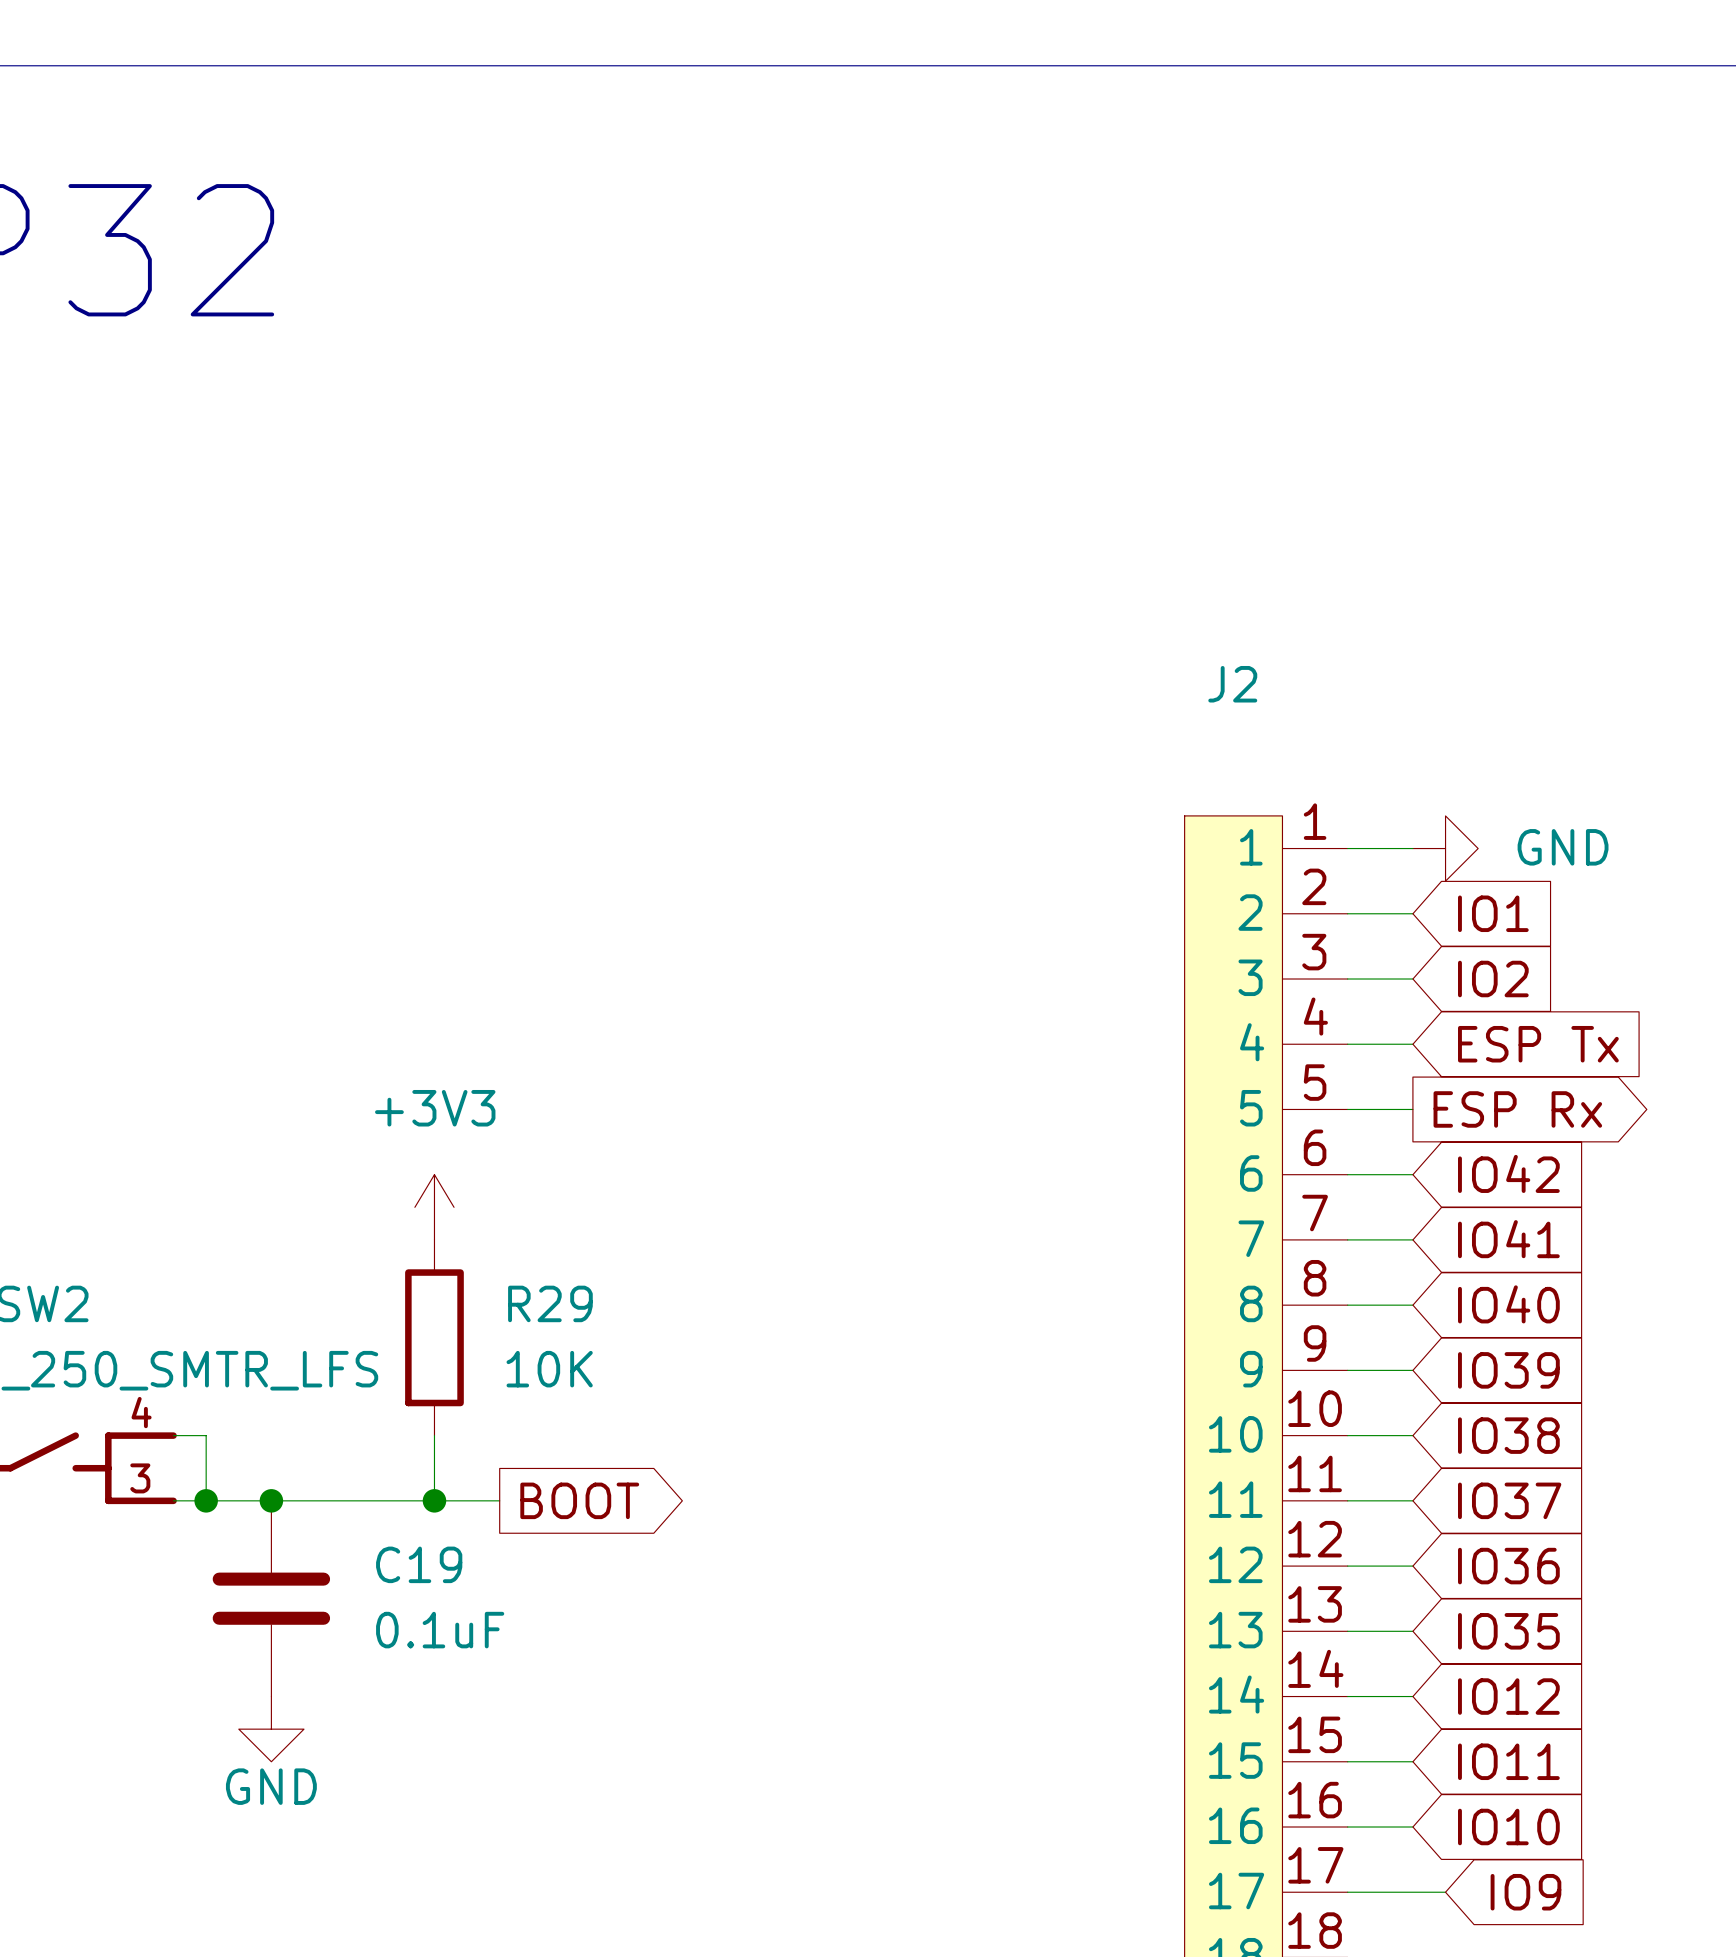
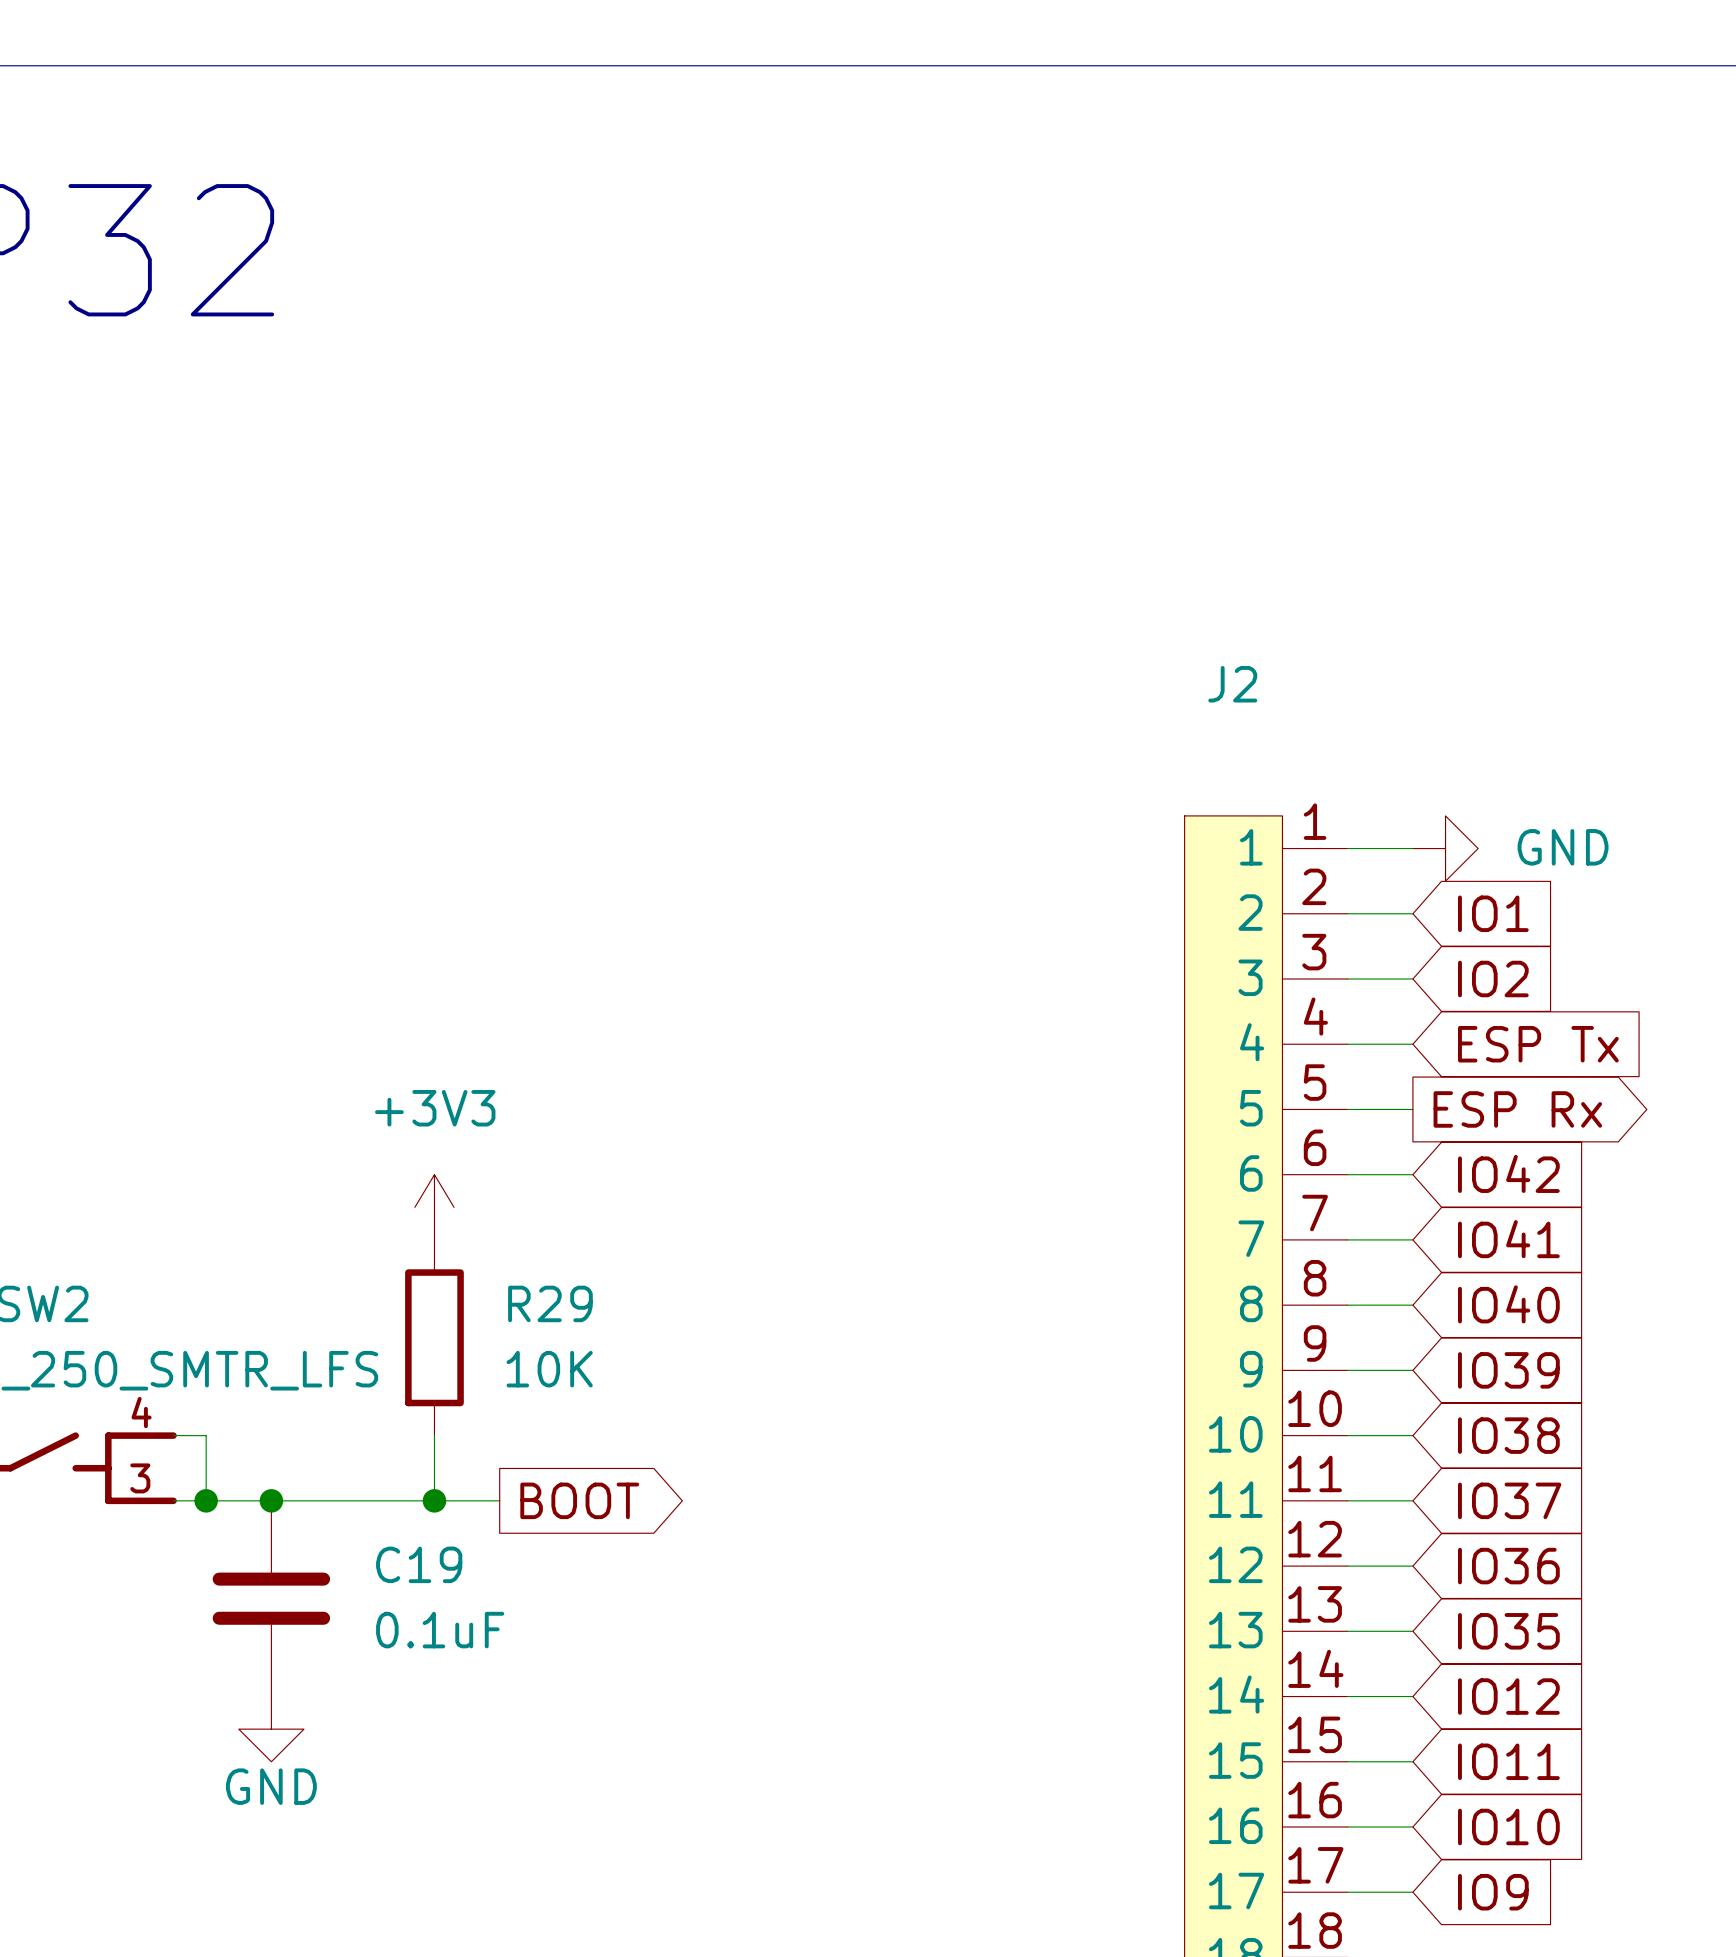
wire: (1412, 1892) (1445, 1892) -> none
global label position: IO9 (1525, 1892) -> IO9 (1493, 1892)

